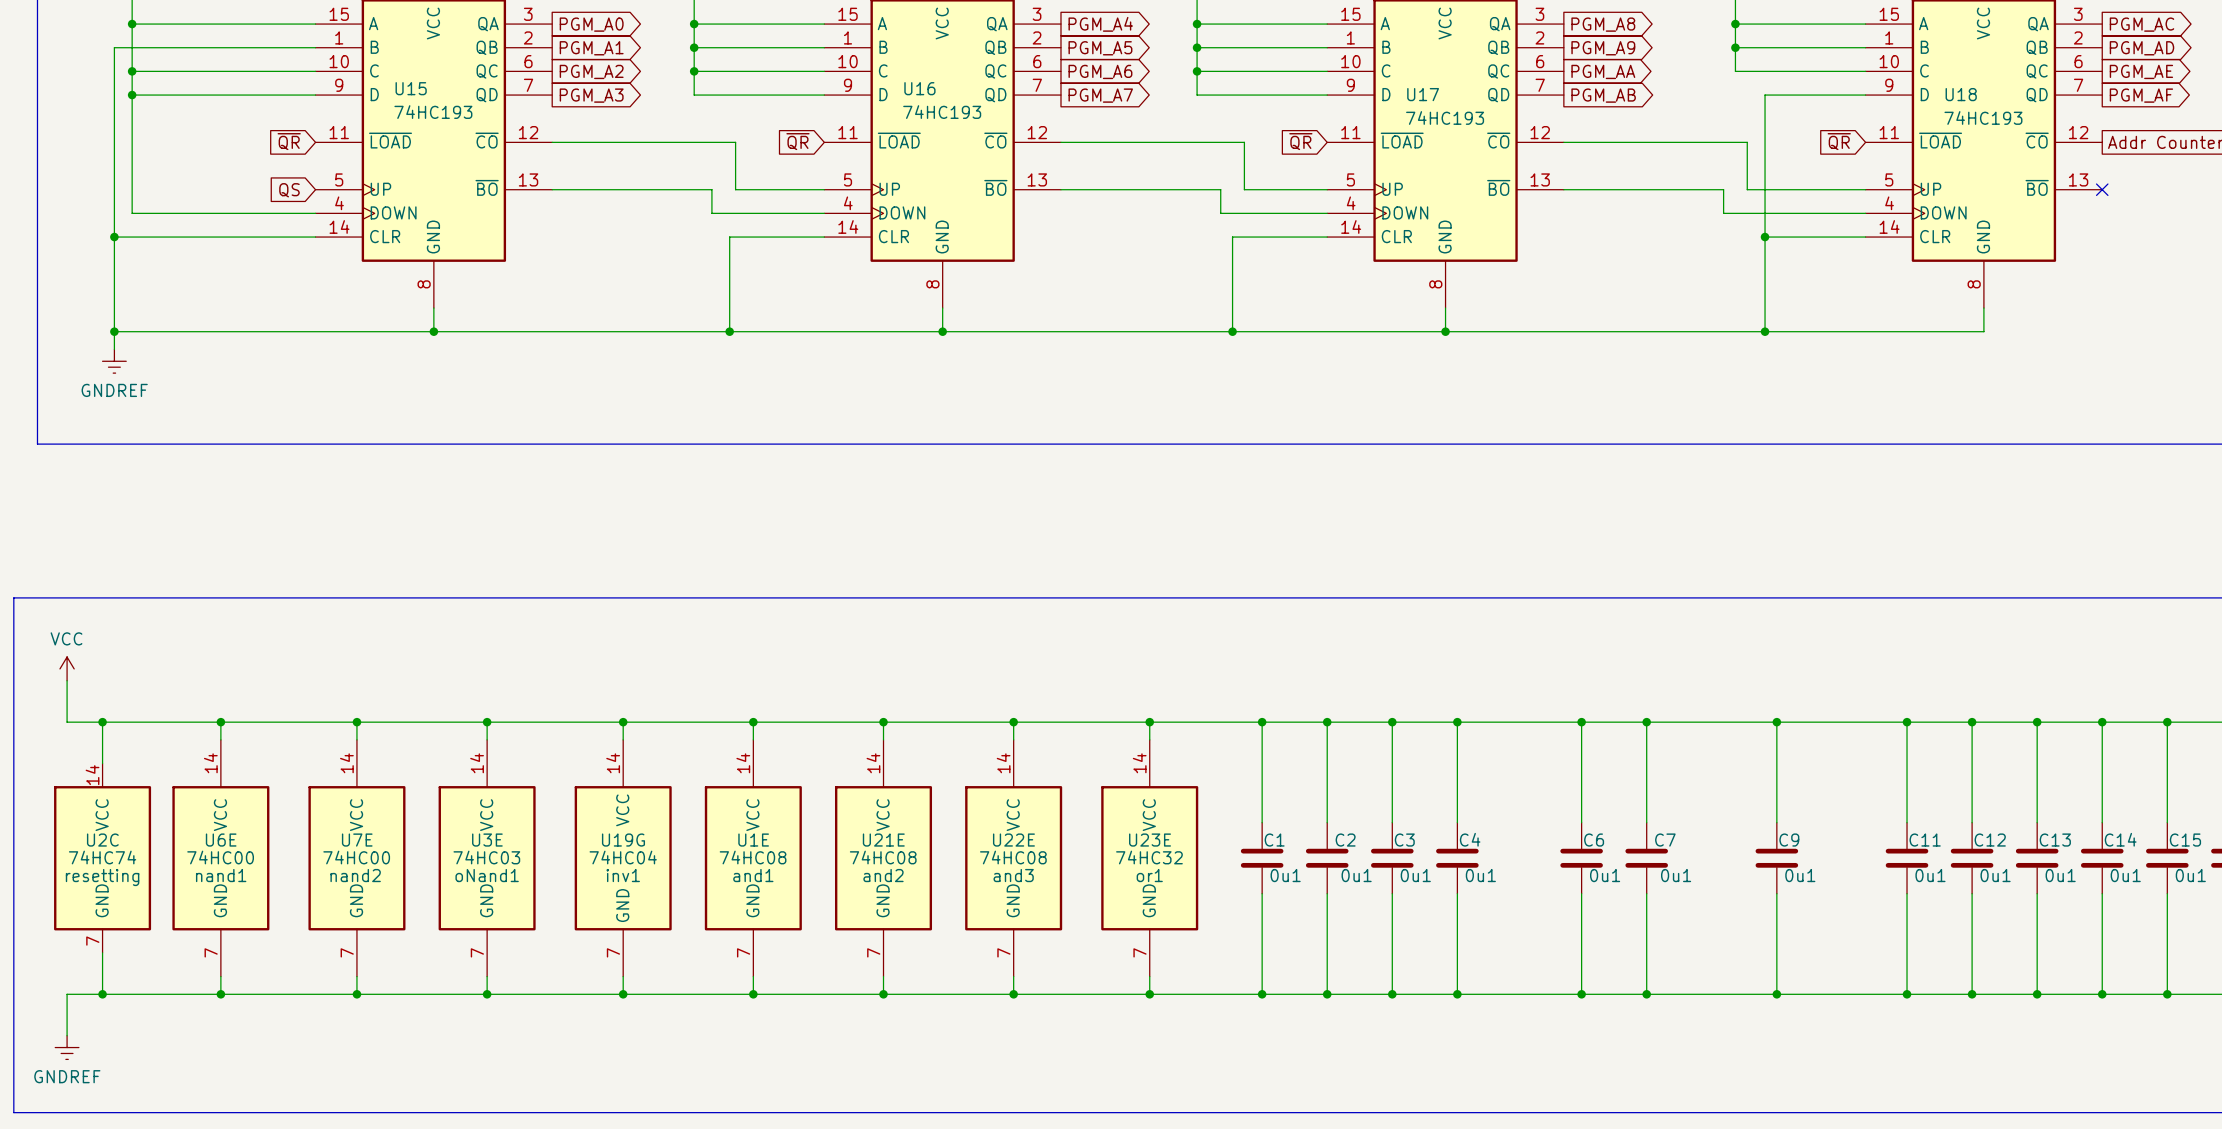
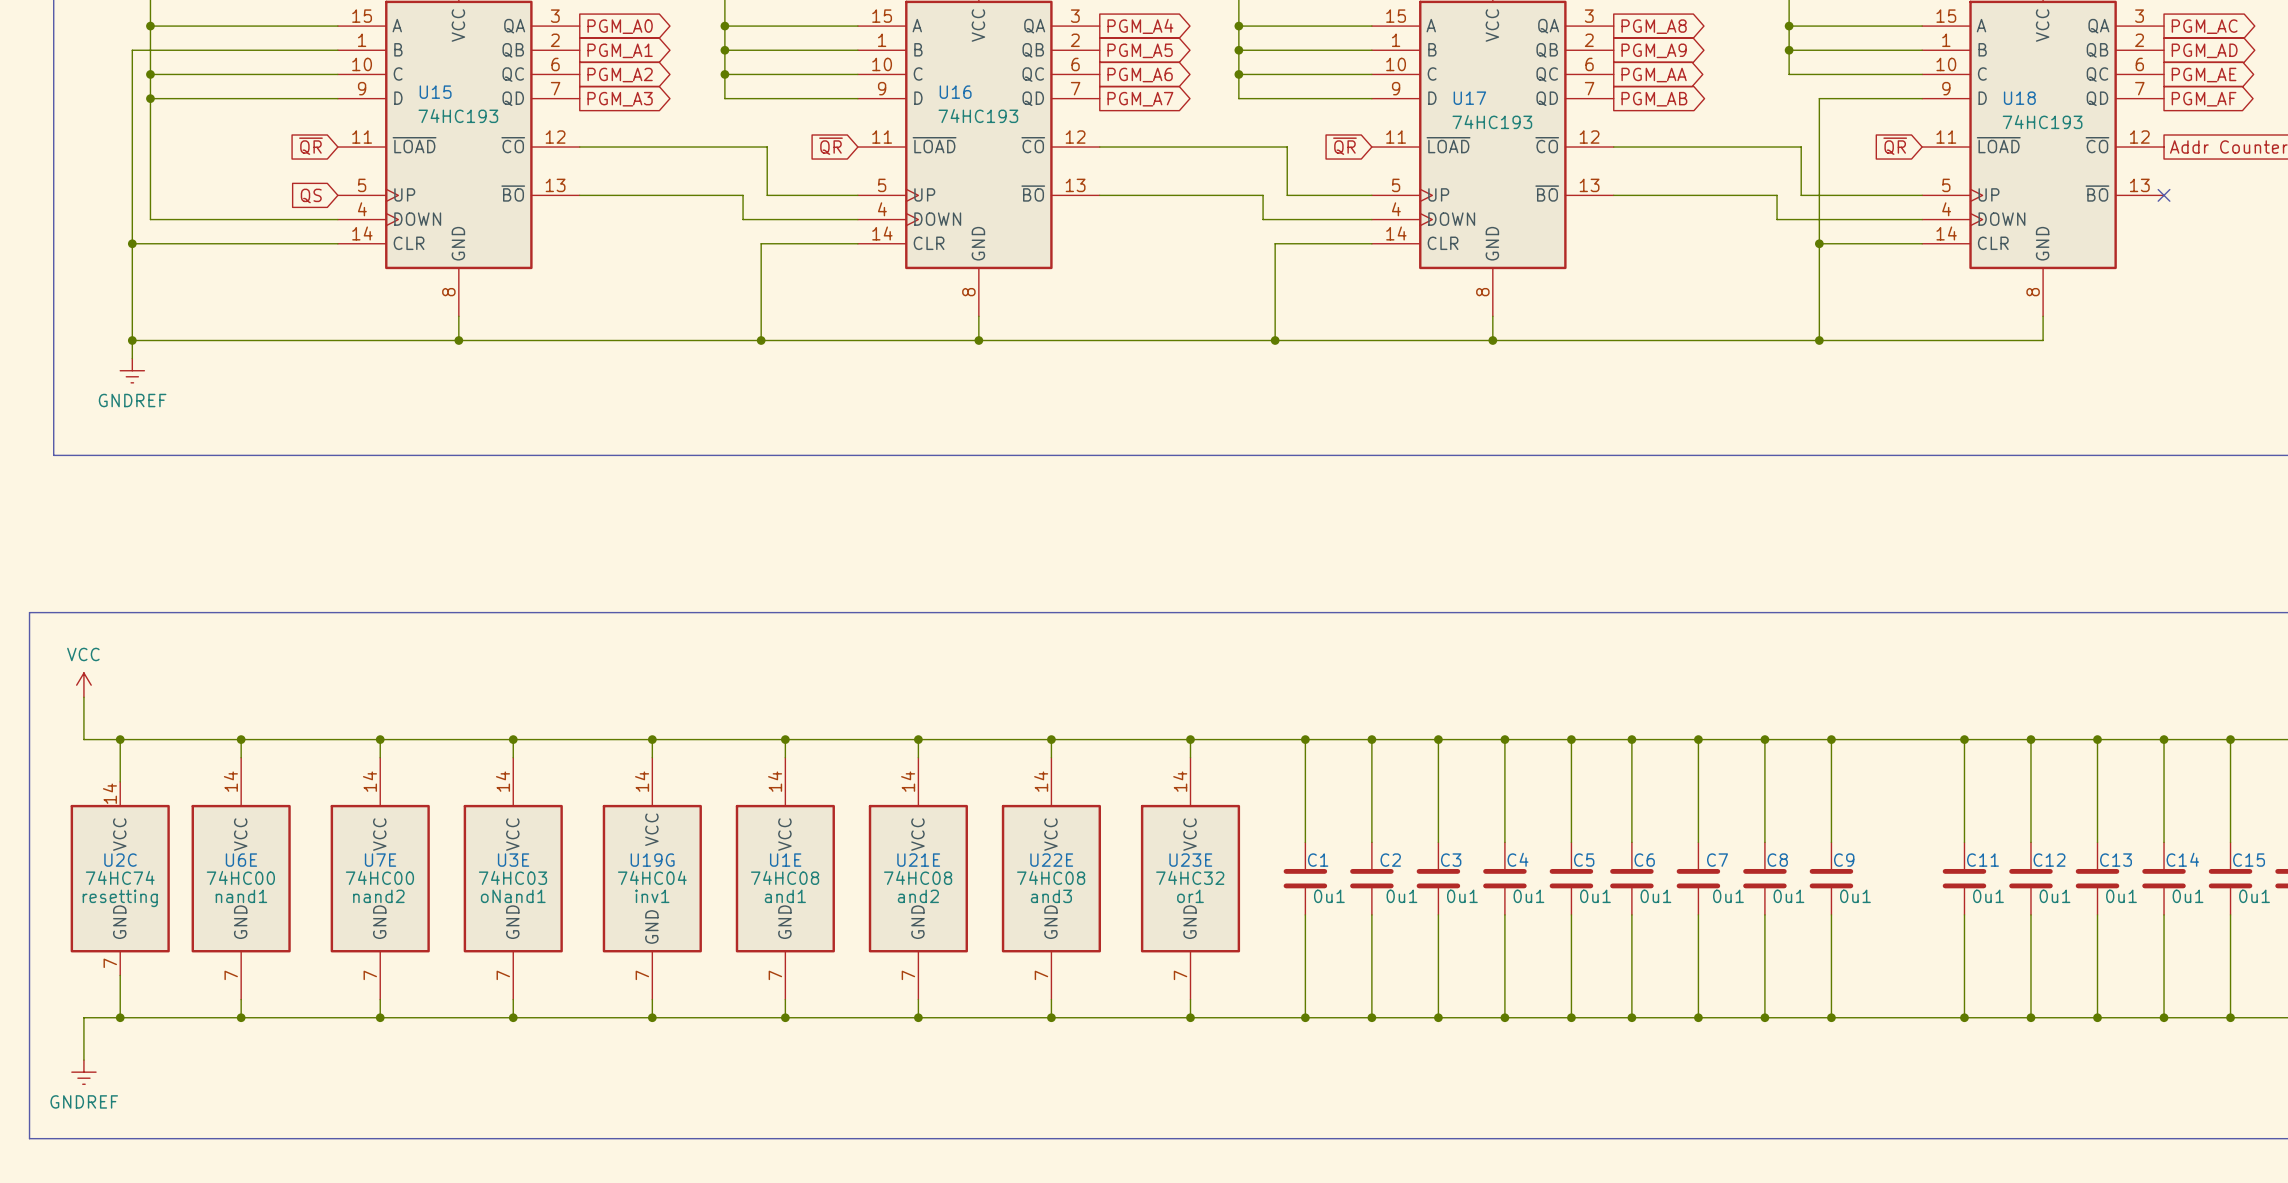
wire: none -> (1571, 739) (1571, 842)
junction: none -> (1571, 739)
wire: none -> (1764, 739) (1764, 842)
junction: none -> (1764, 739)
C5: none -> 0u1 (1571, 878)
C8: none -> 0u1 (1764, 878)
wire: none -> (1571, 914) (1571, 1017)
wire: none -> (1764, 914) (1764, 1017)
junction: none -> (1571, 1017)
junction: none -> (1764, 1017)

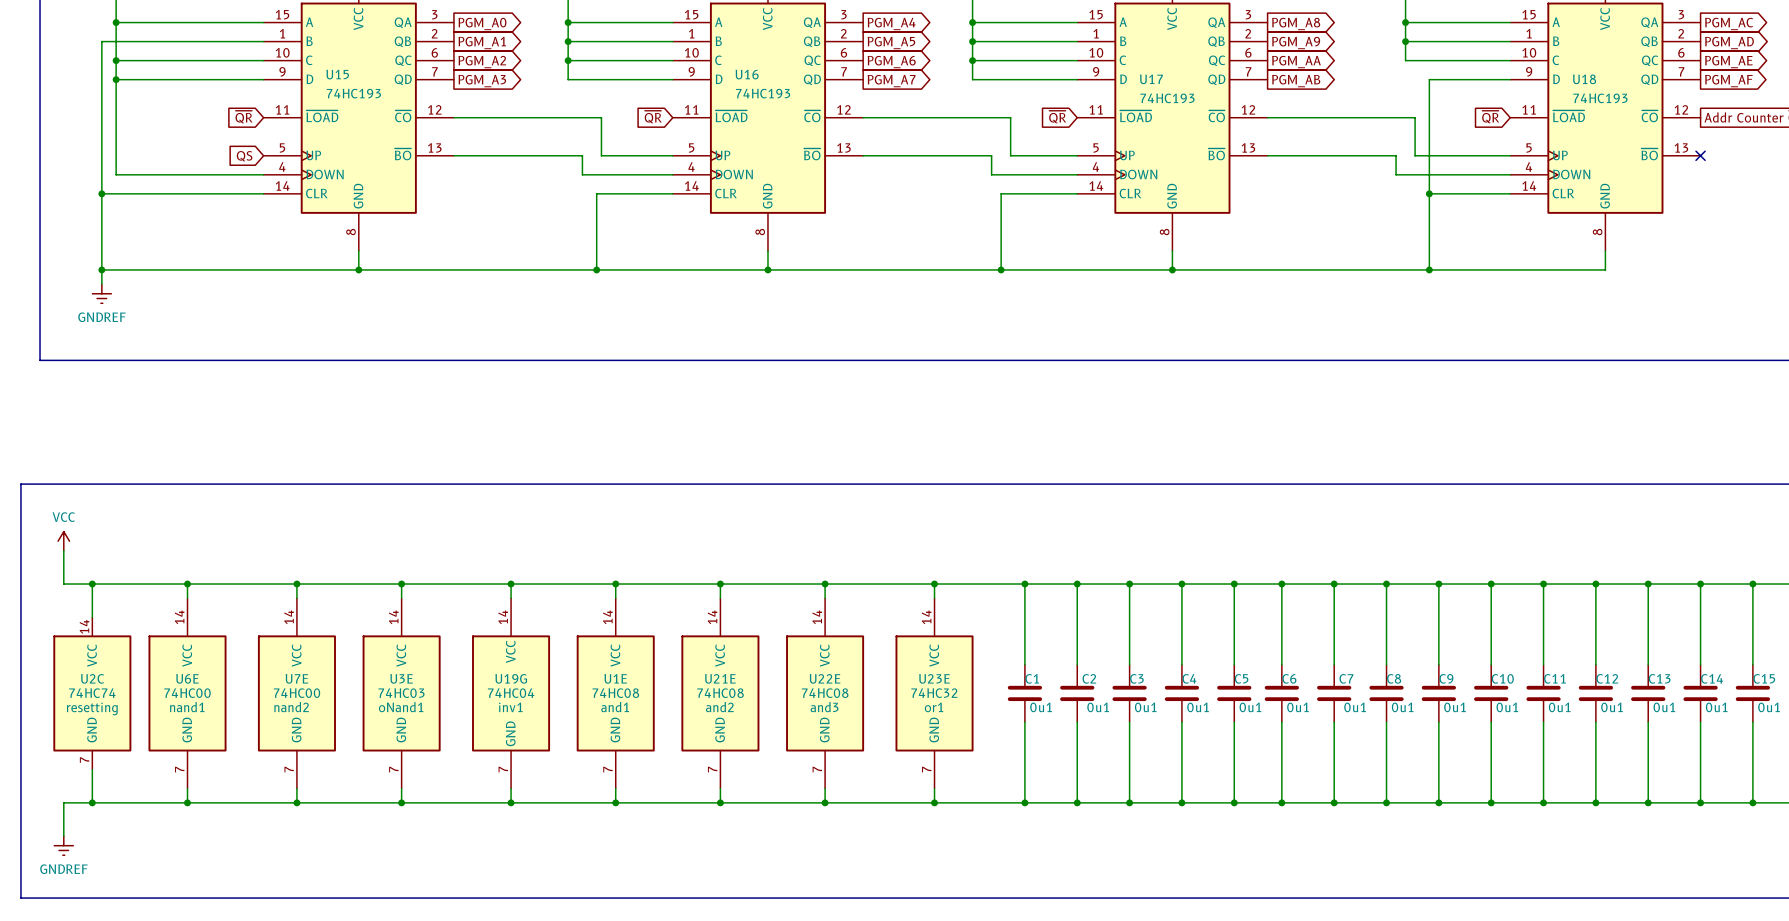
wire: none -> (1491, 584) (1491, 664)
junction: none -> (1491, 584)
C10: none -> 0u1 (1491, 693)
wire: none -> (1491, 721) (1491, 802)
junction: none -> (1491, 802)

